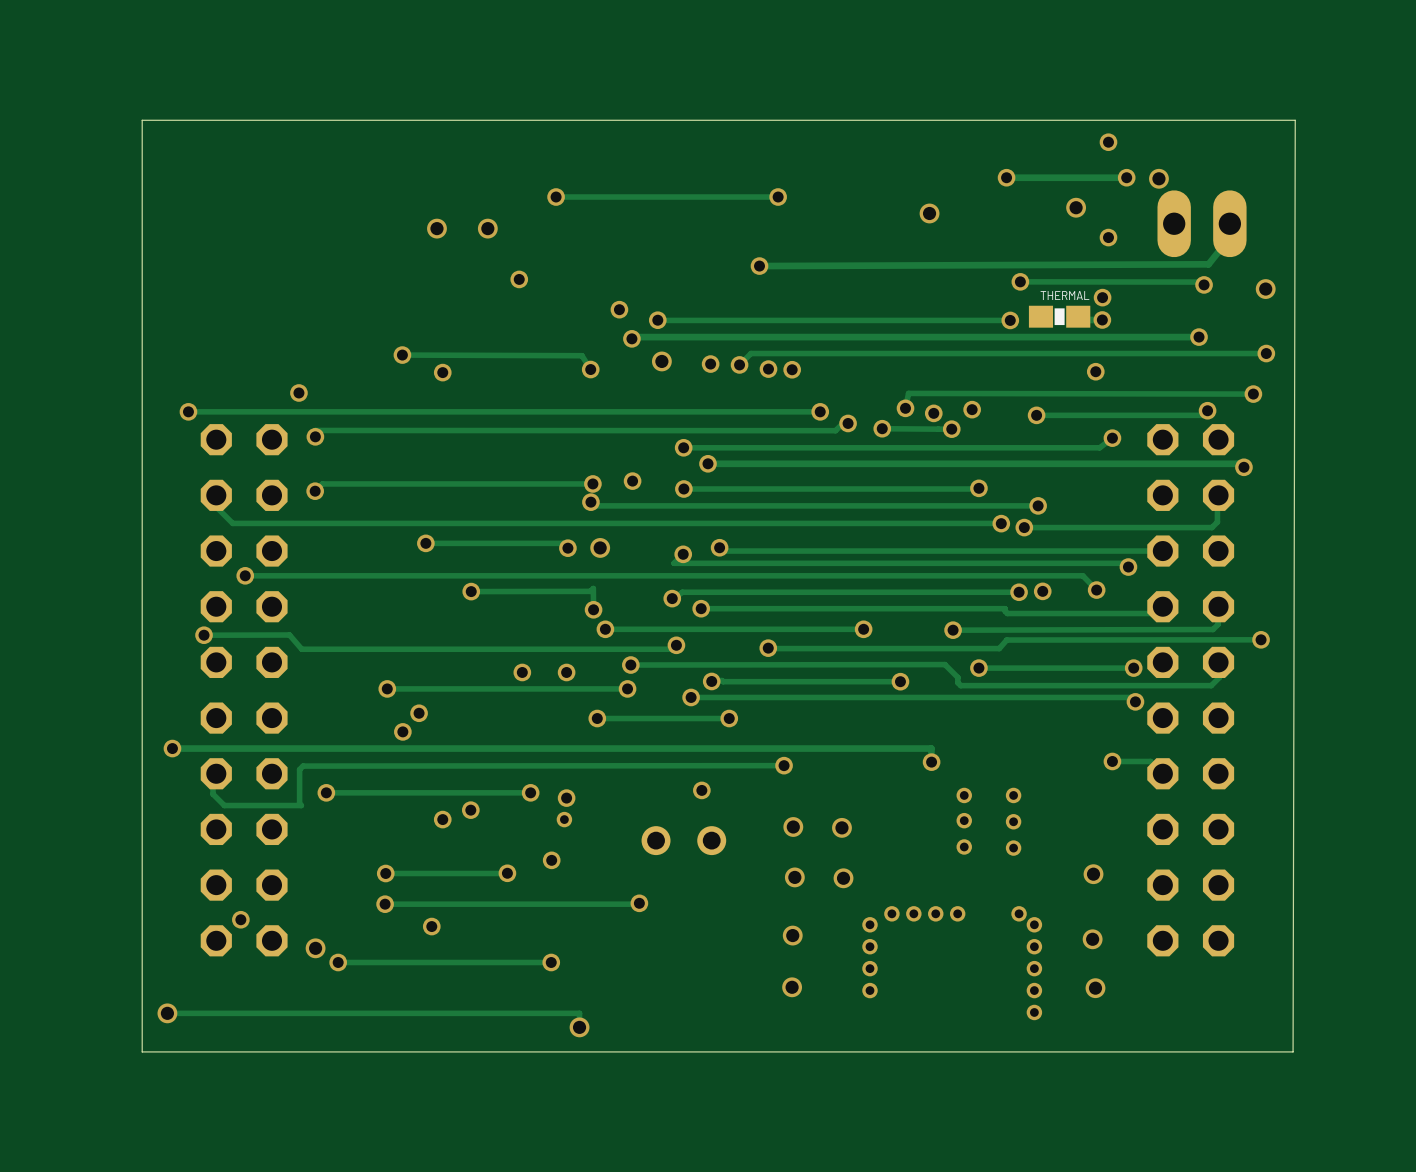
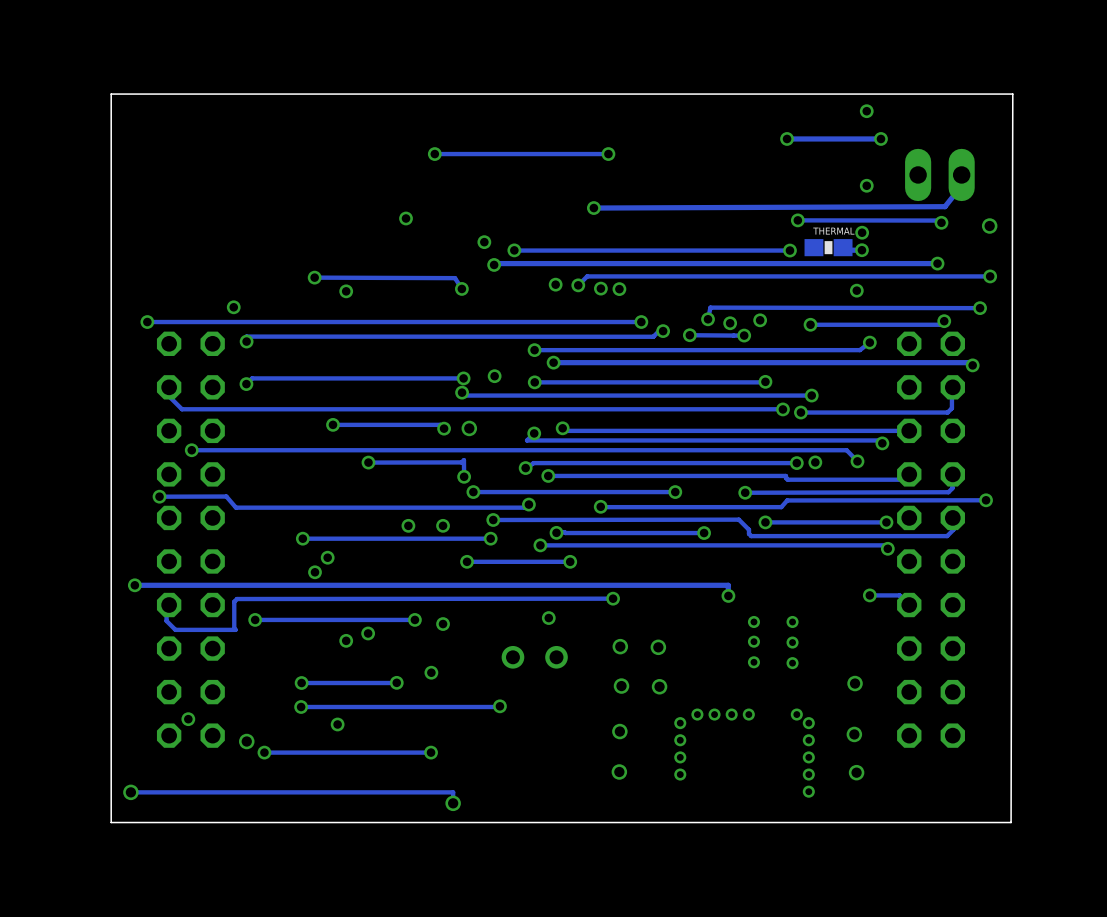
via: (1158, 178) -> none
via: (1076, 207) -> none
via: (929, 213) -> none
via: (436, 228) -> none
via: (487, 228) -> none
via: (661, 361) -> none
via: (564, 819) -> none

